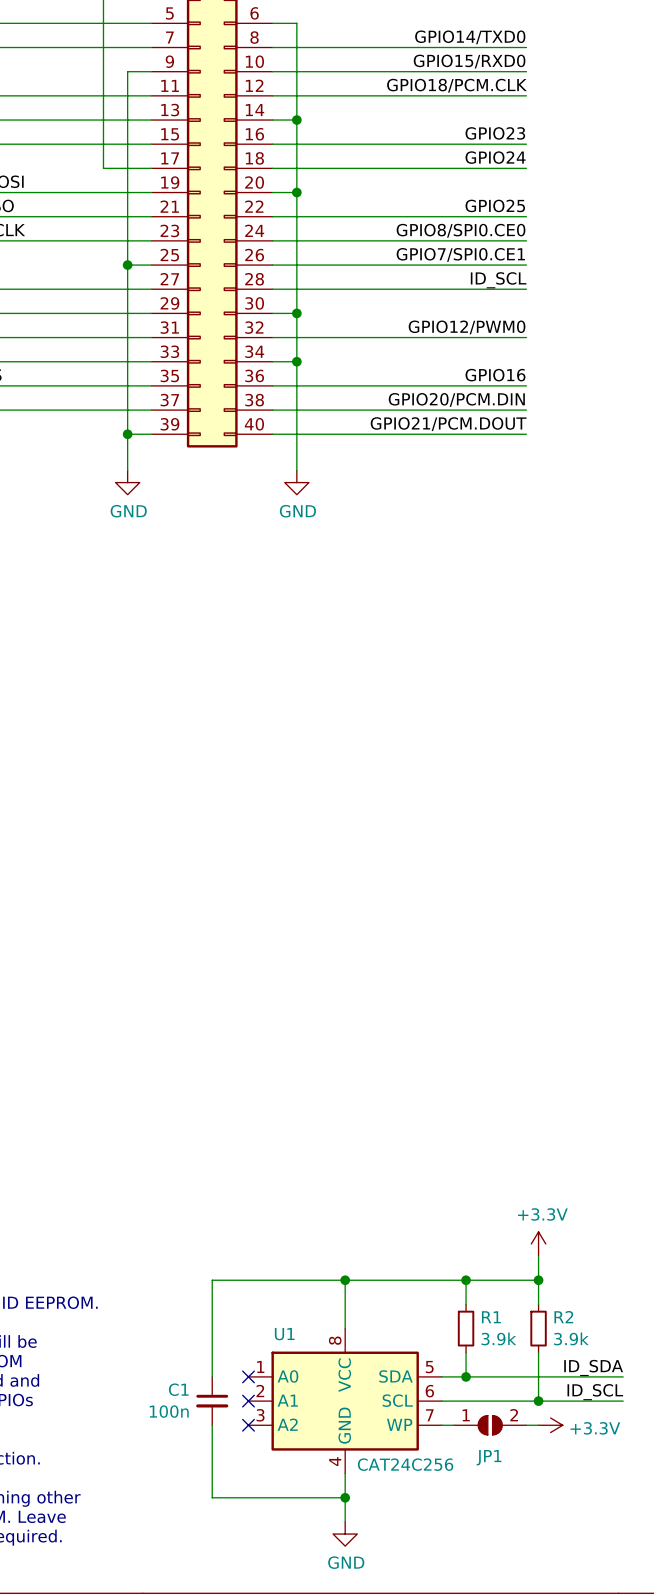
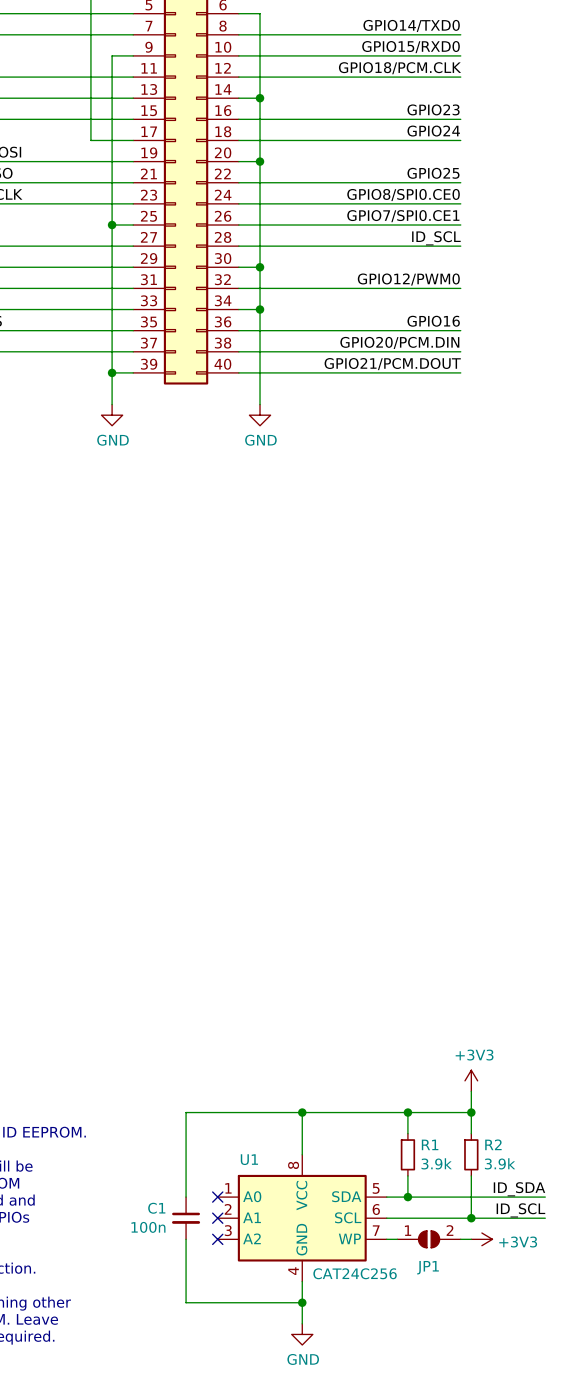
power symbol: +3.3V (538, 1243) -> +3V3 (471, 1080)
power symbol: +3.3V (550, 1425) -> +3V3 (481, 1239)

